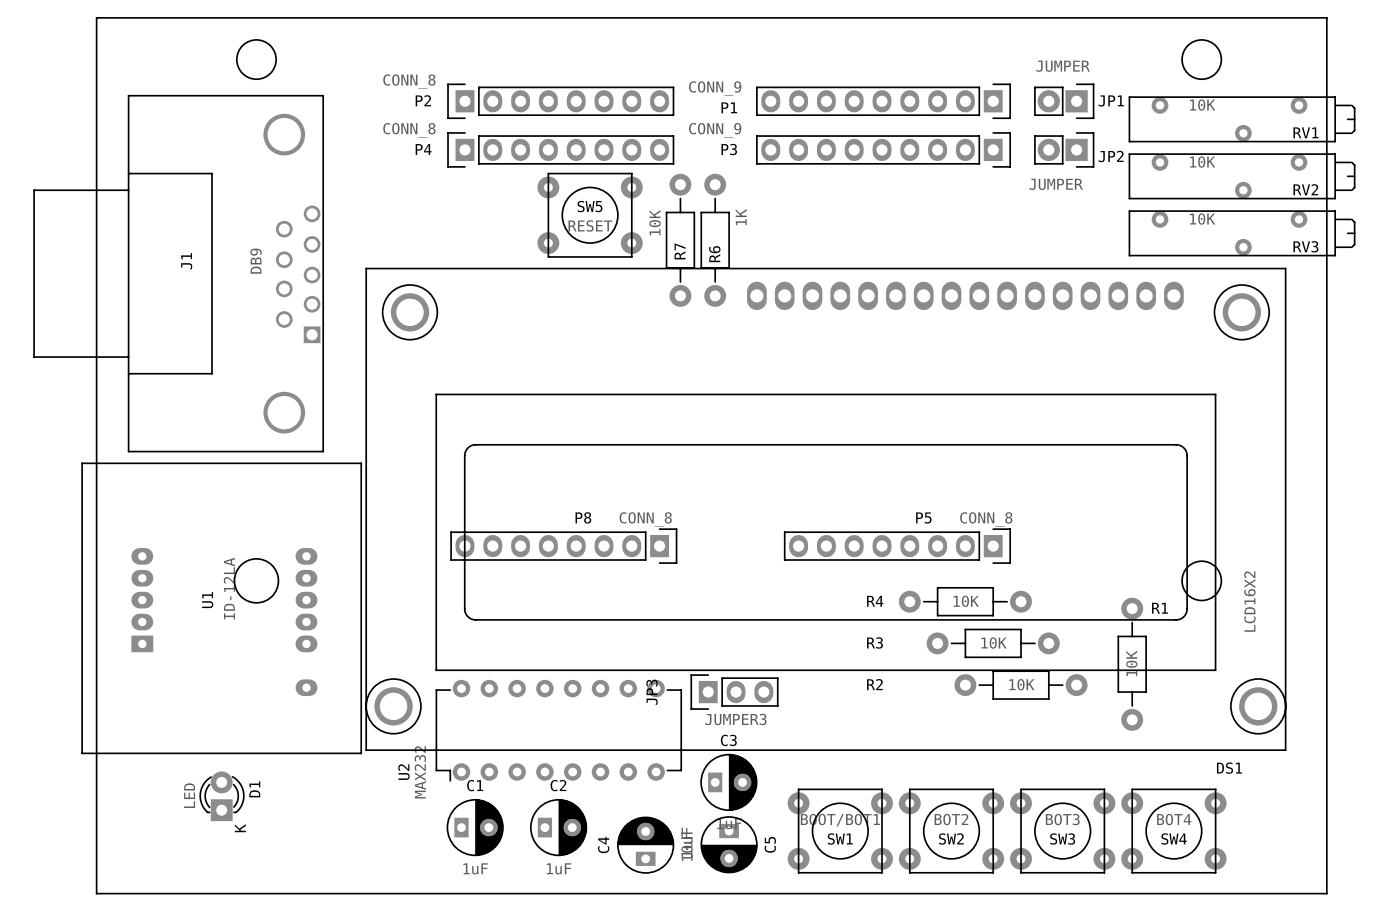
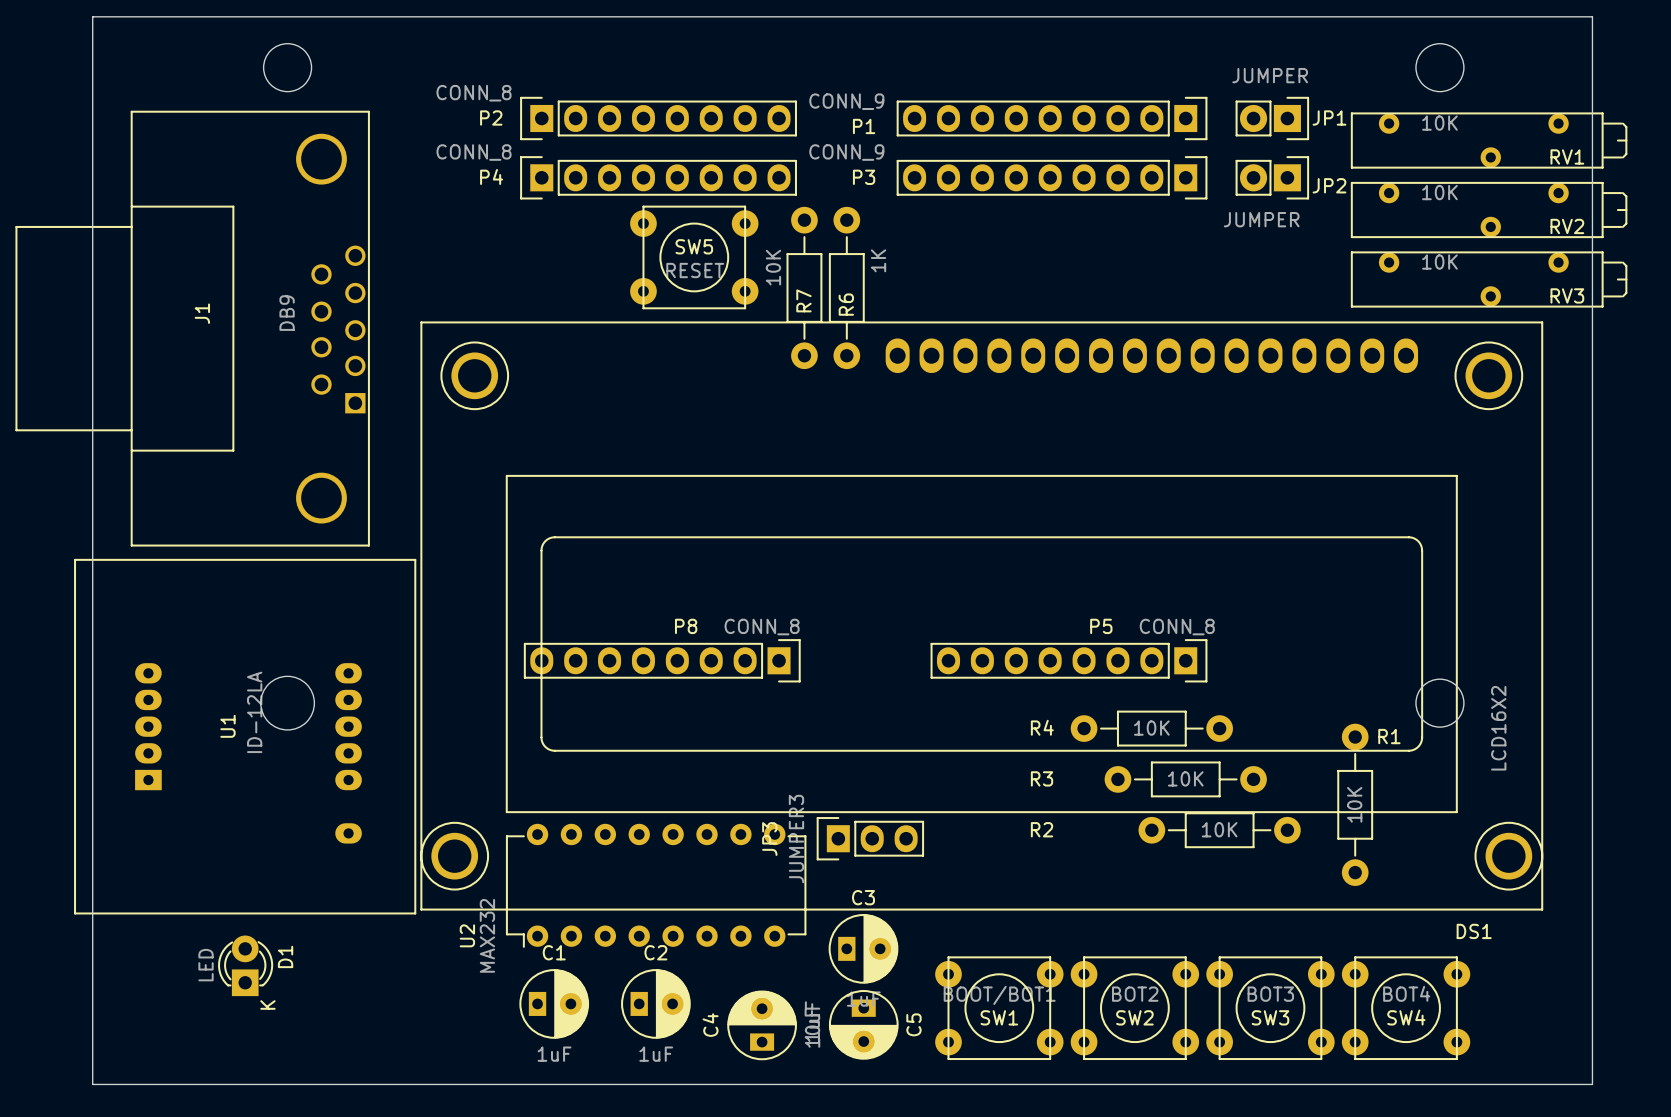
JP3 value rotation: 0° (735, 719) -> 90° counterclockwise (796, 839)

